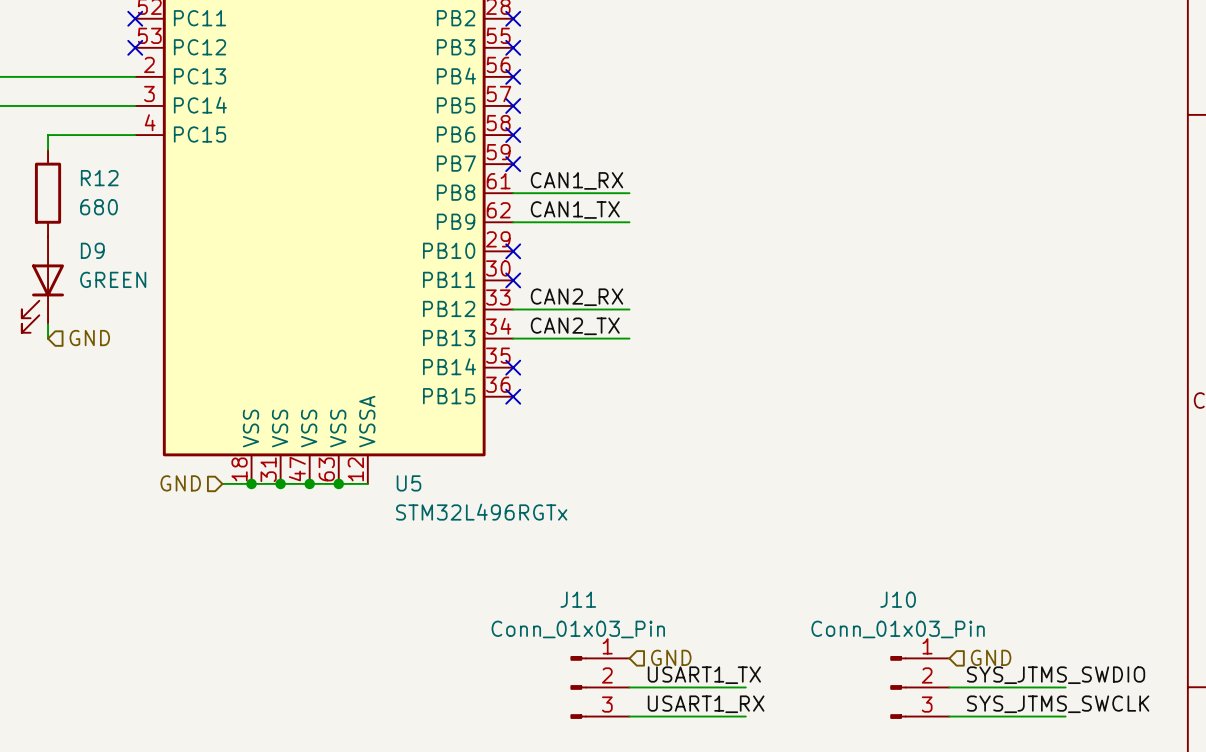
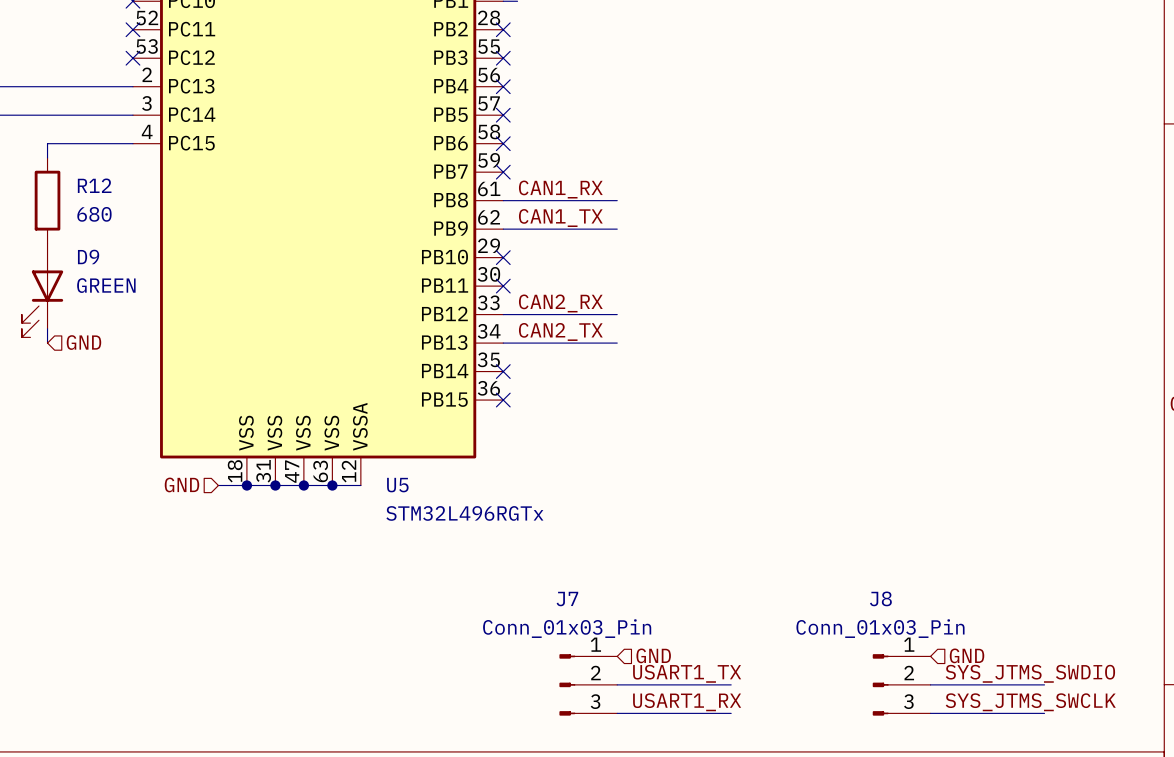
J11 name: J11 (578, 599) -> J7 (567, 599)
J10 name: J10 (898, 599) -> J8 (880, 598)

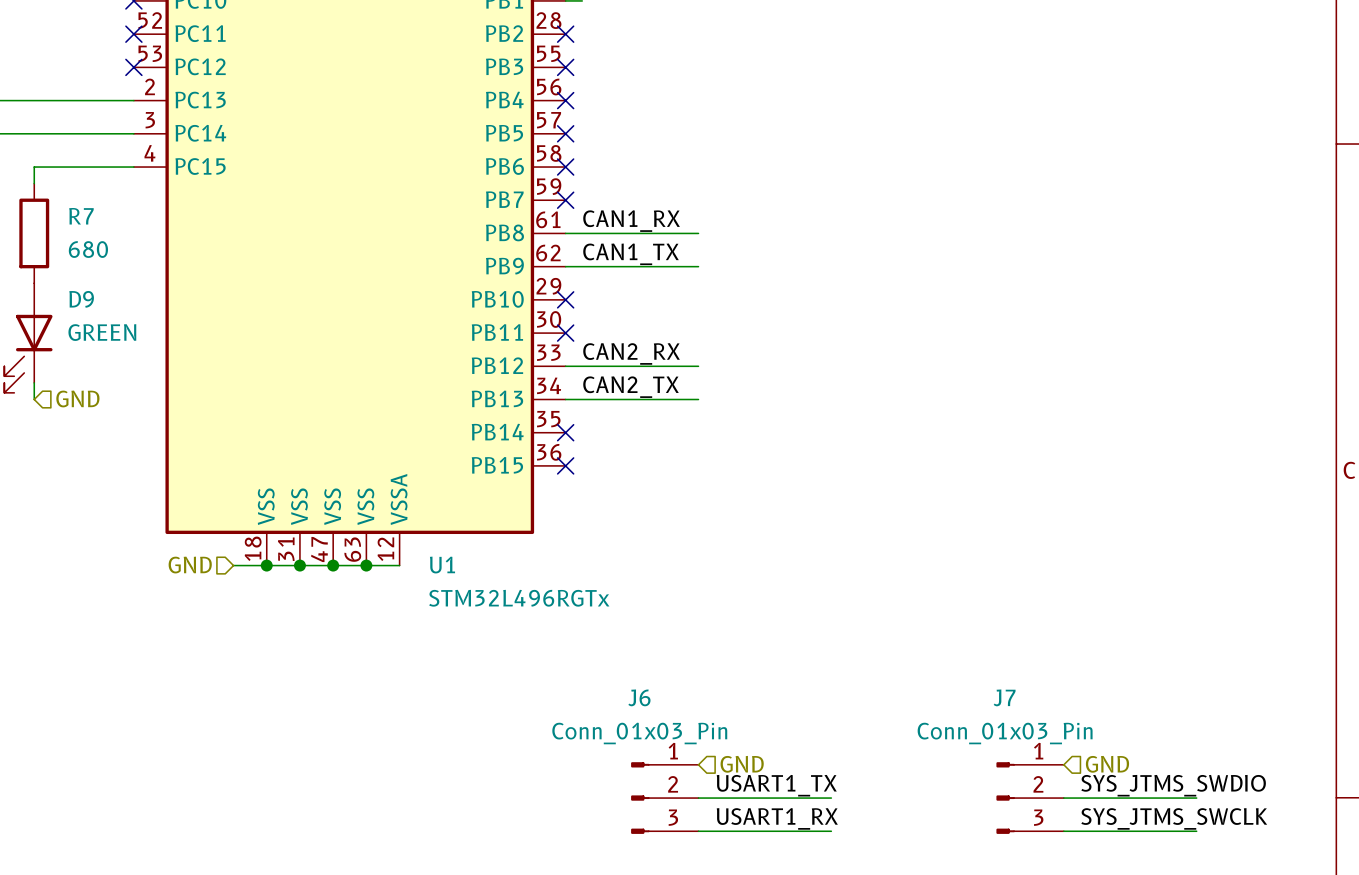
R12 name: R12 (94, 185) -> R7 (81, 216)
U5 name: U5 (397, 485) -> U1 (442, 565)
J8 name: J8 (880, 598) -> J7 (1004, 697)
J7 name: J7 (567, 599) -> J6 (639, 697)

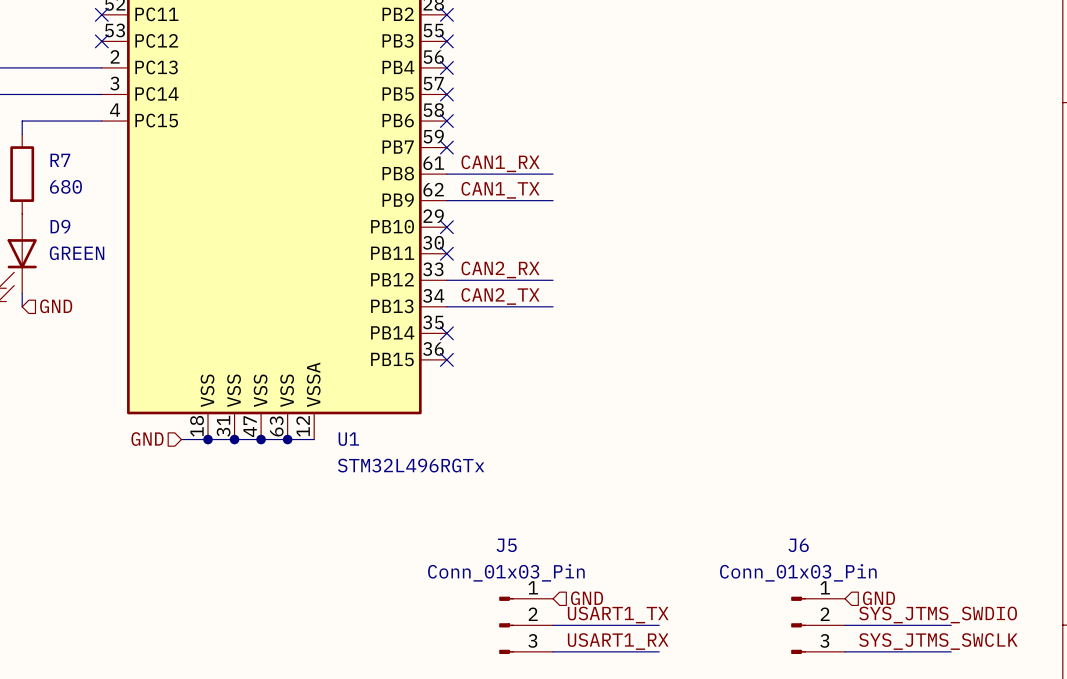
J6 name: J6 (639, 697) -> J5 (506, 545)
J7 name: J7 (1004, 697) -> J6 (798, 545)

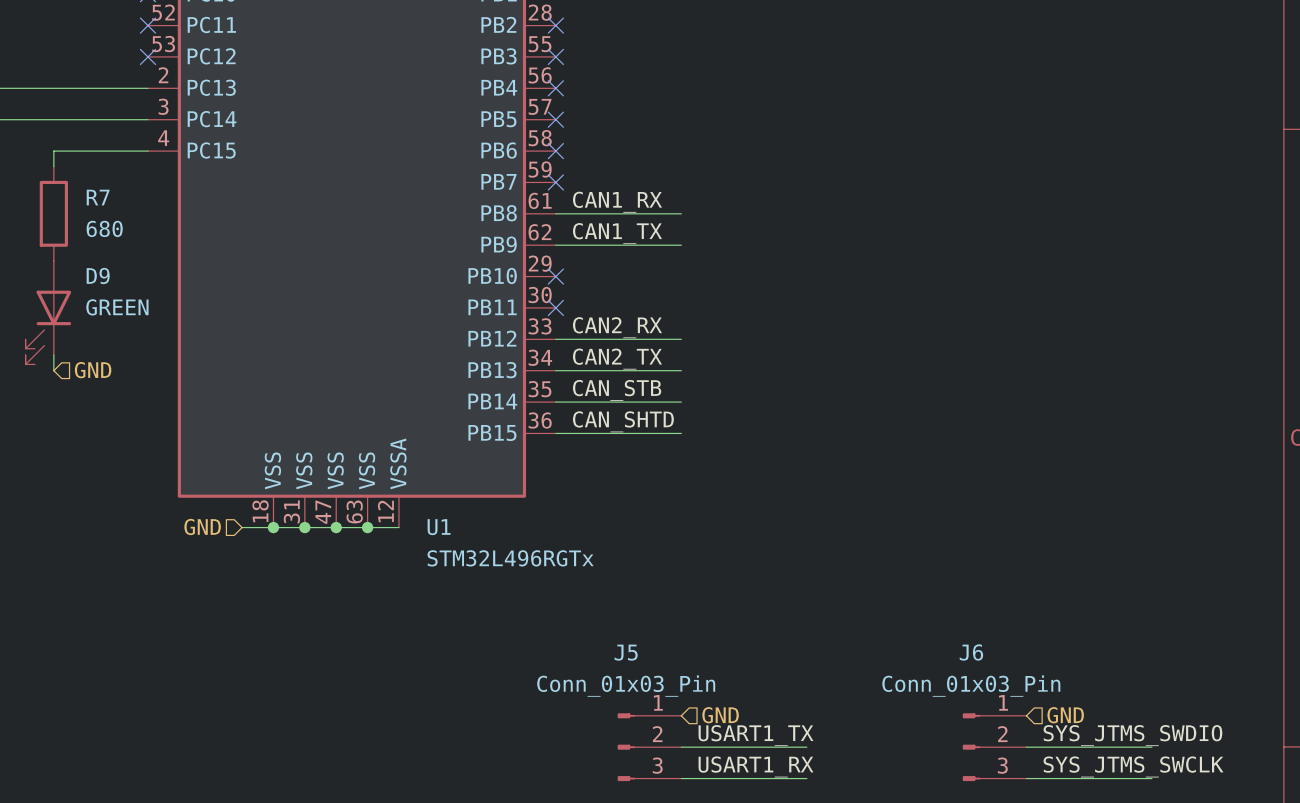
label: none -> CAN_STB (617, 390)
wire: none -> (555, 402) (681, 402)
no-connect mark: (446, 333) -> none
label: none -> CAN_SHTD (623, 421)
wire: none -> (555, 433) (681, 433)
no-connect mark: (446, 359) -> none

